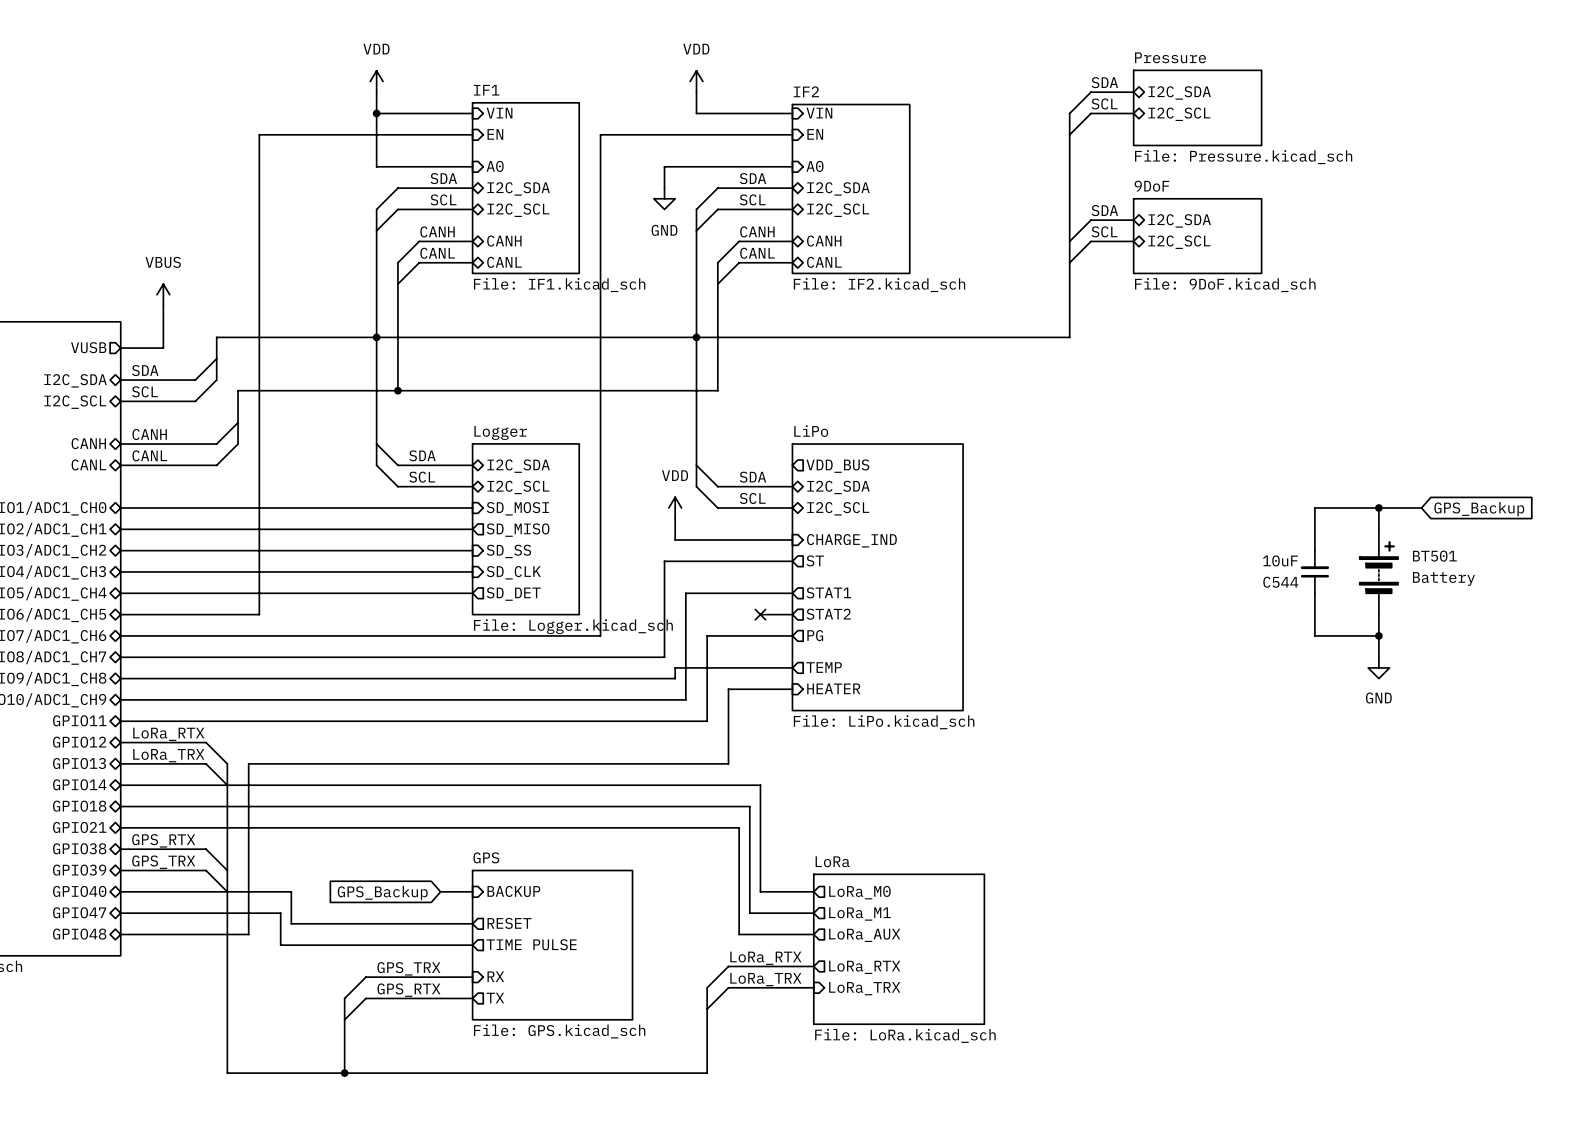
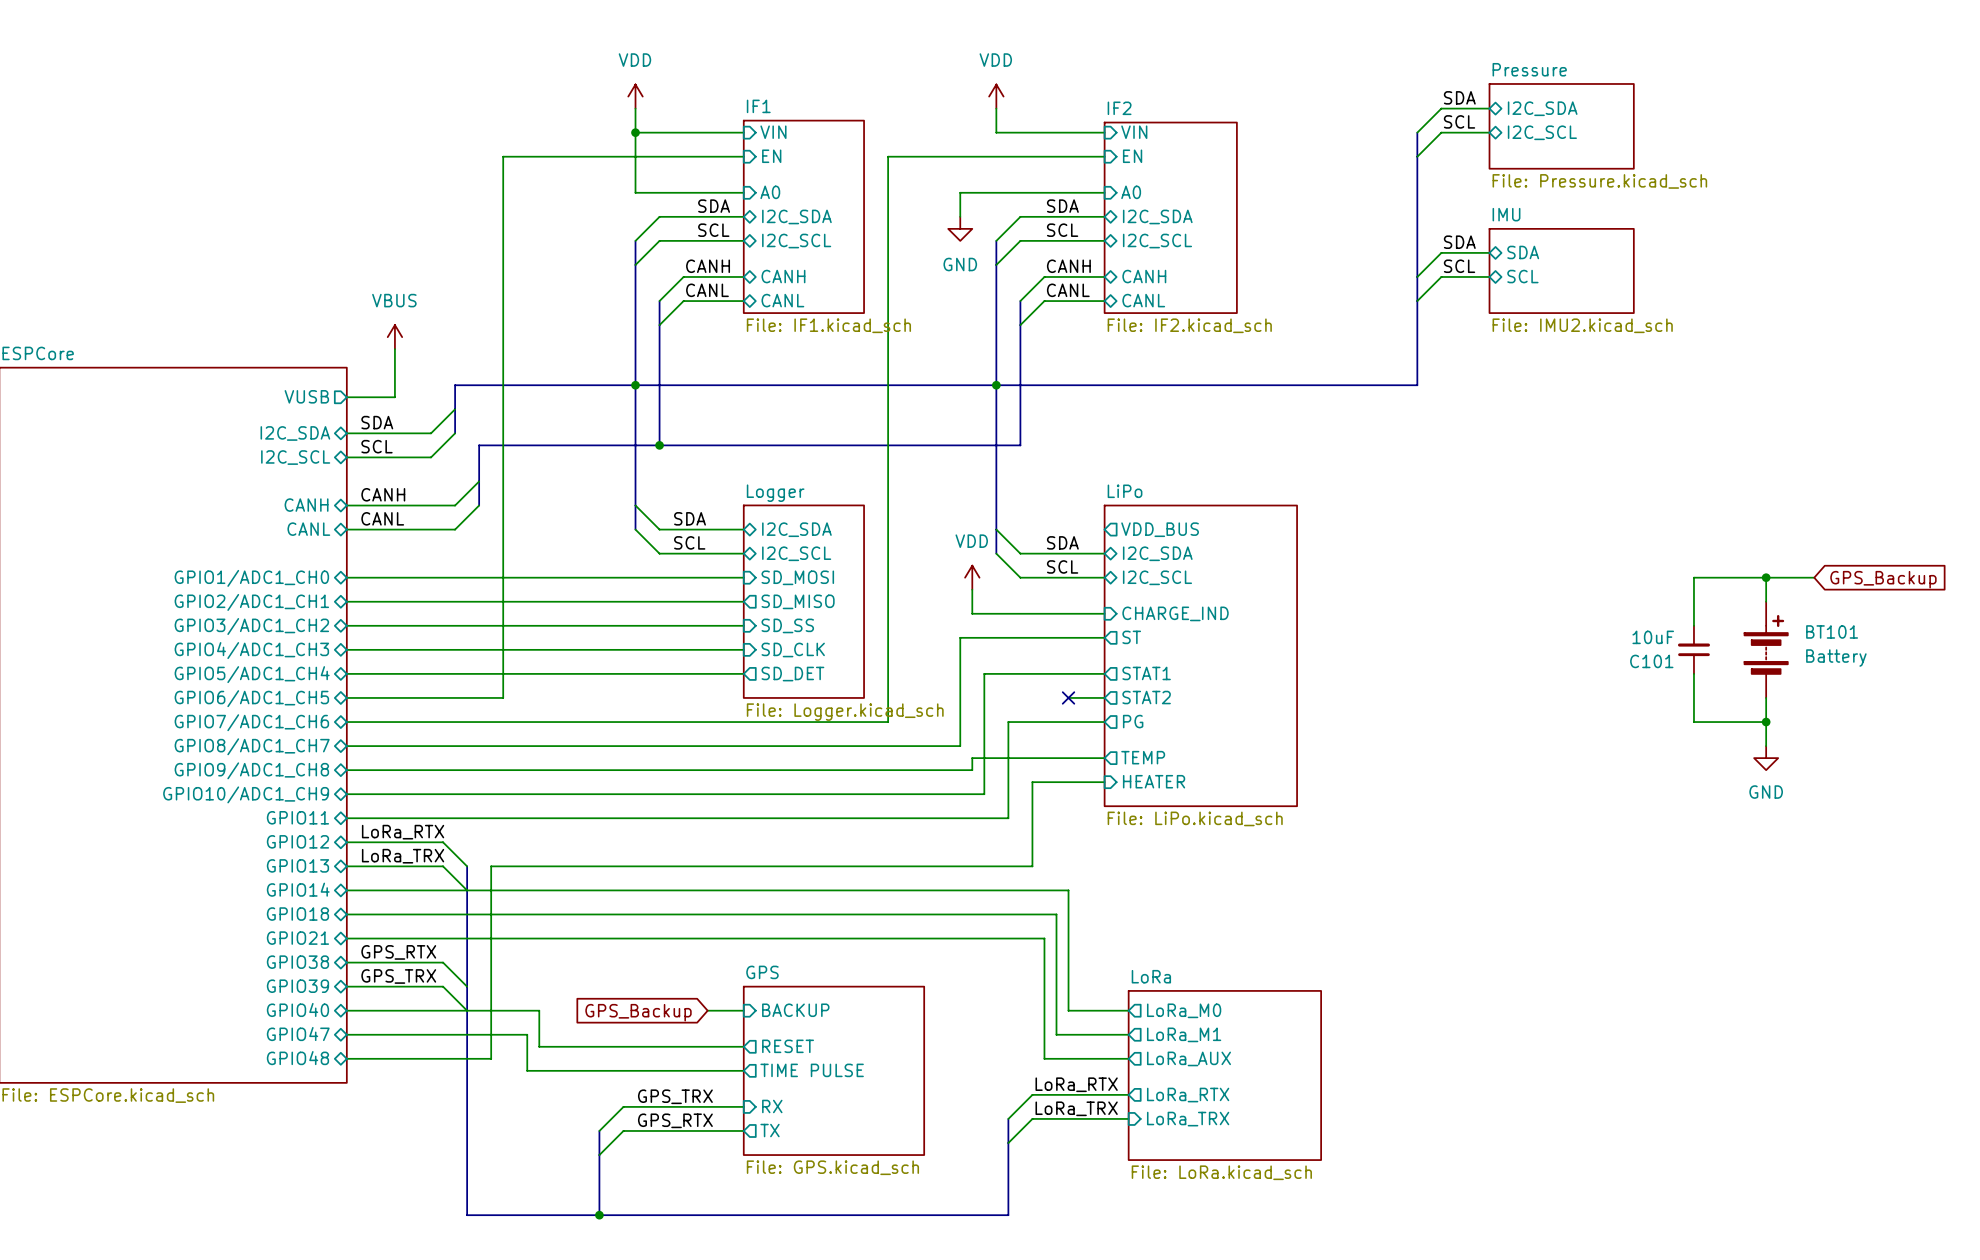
sheet 9DoF name: 9DoF (1151, 186) -> IMU (1506, 214)
sheet pin: I2C_SDA (1179, 220) -> SDA (1523, 252)
sheet pin: I2C_SCL (1179, 242) -> SCL (1522, 276)
sheet 9DoF value: File: 9DoF.kicad_sch (1225, 285) -> File: IMU2.kicad_sch (1582, 325)
BT501 name: BT501 (1434, 556) -> BT101 (1832, 631)
C544 name: C544 (1280, 582) -> C101 (1651, 661)

